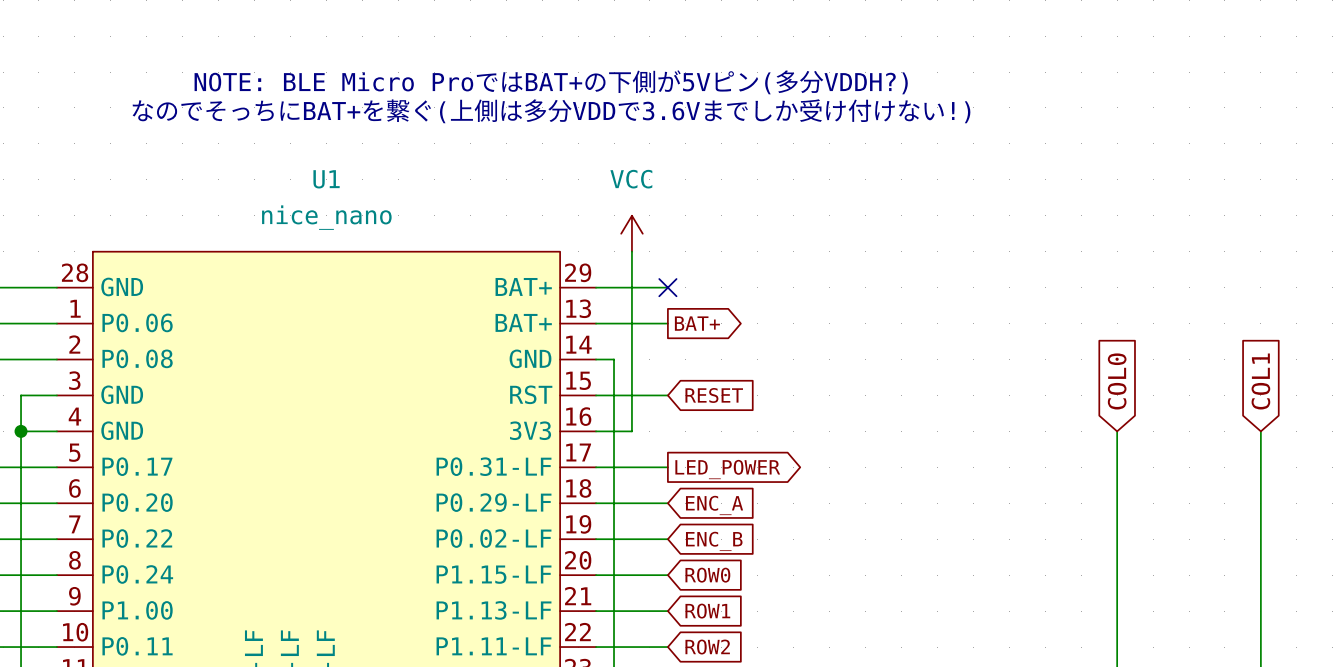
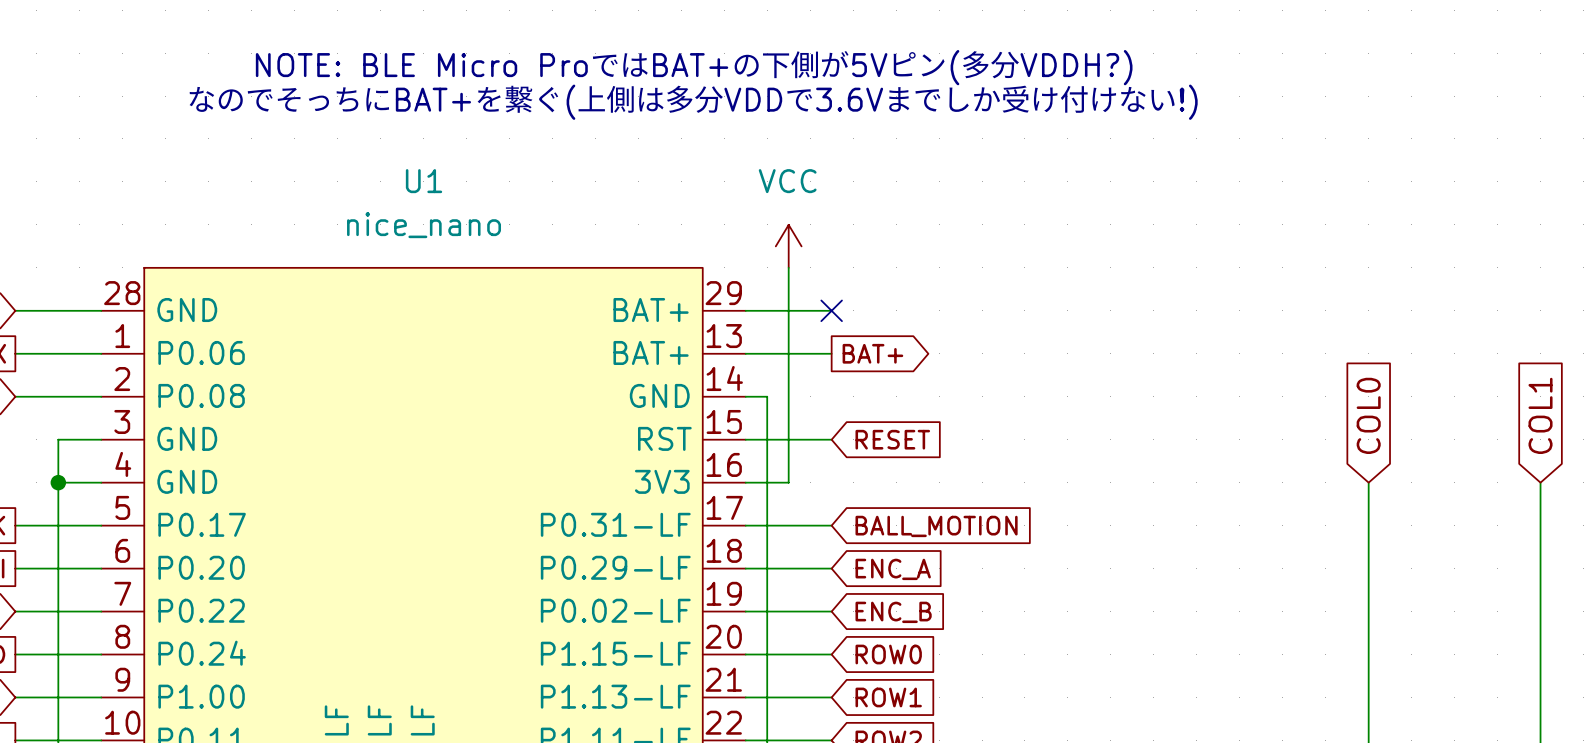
global label shape: output (727, 469) -> input (936, 526)
global label: LED_POWER (727, 469) -> BALL_MOTION (936, 526)

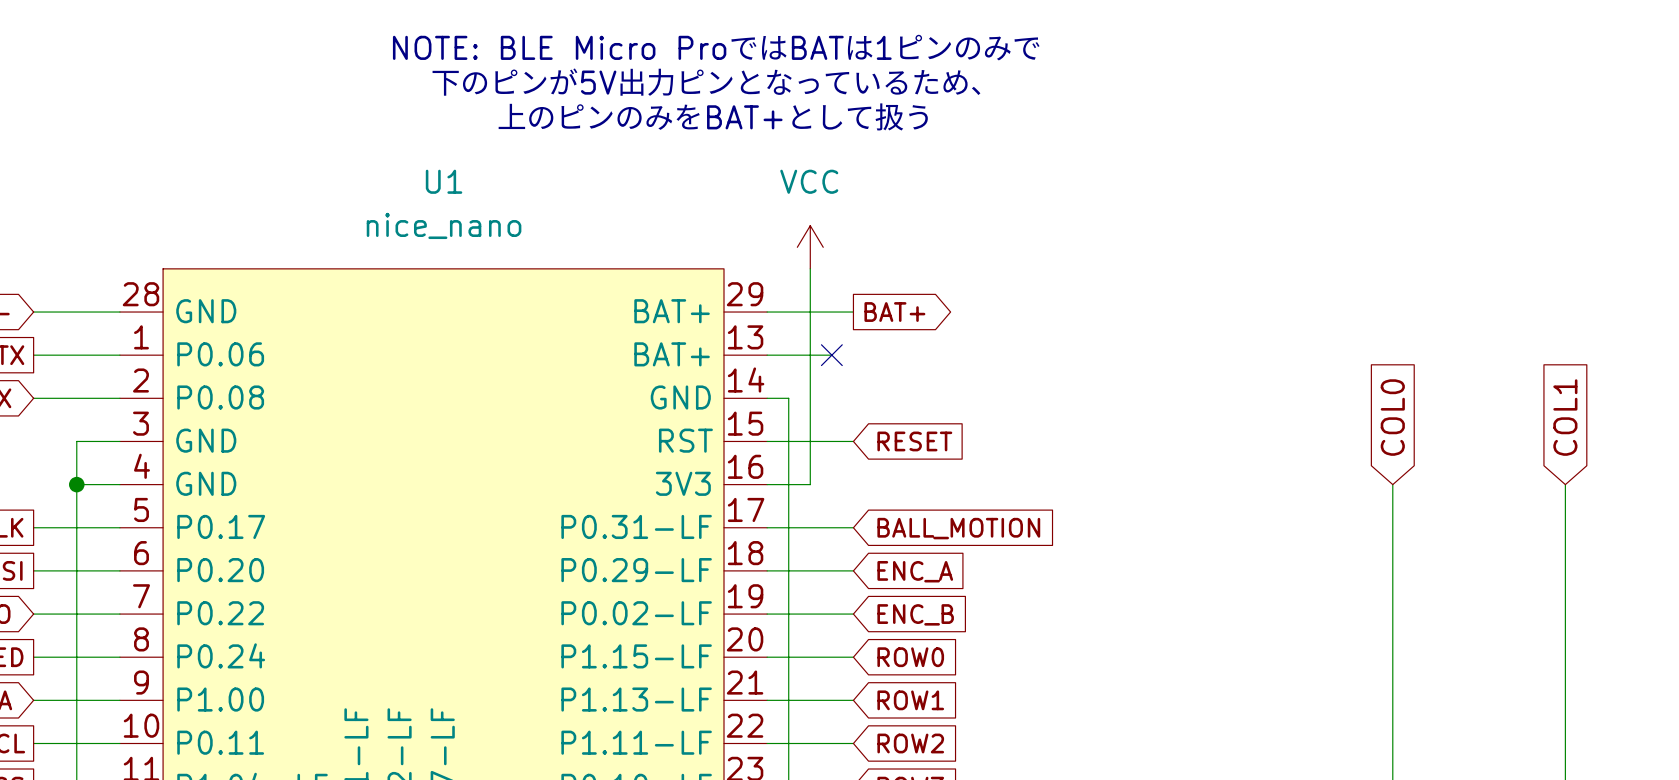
text: NOTE: BLE Micro ProではBAT+の下側が5Vピン(多分VDDH?) (694, 67) -> NOTE: BLE Micro ProではBATは1ピンのみで (716, 47)
text: none -> 下のピンが5V出力ピンとなっているため、 (706, 82)
text: なのでそっちにBAT+を繋ぐ(上側は多分VDDで3.6Vまでしか受け付けない!) (692, 102) -> none
text: none -> 上のピンのみをBAT+として扱う (713, 116)
no-connect mark position: (831, 310) -> (831, 355)
wire: (810, 353) (831, 353) -> none
global label position: BAT+ (872, 353) -> BAT+ (894, 312)

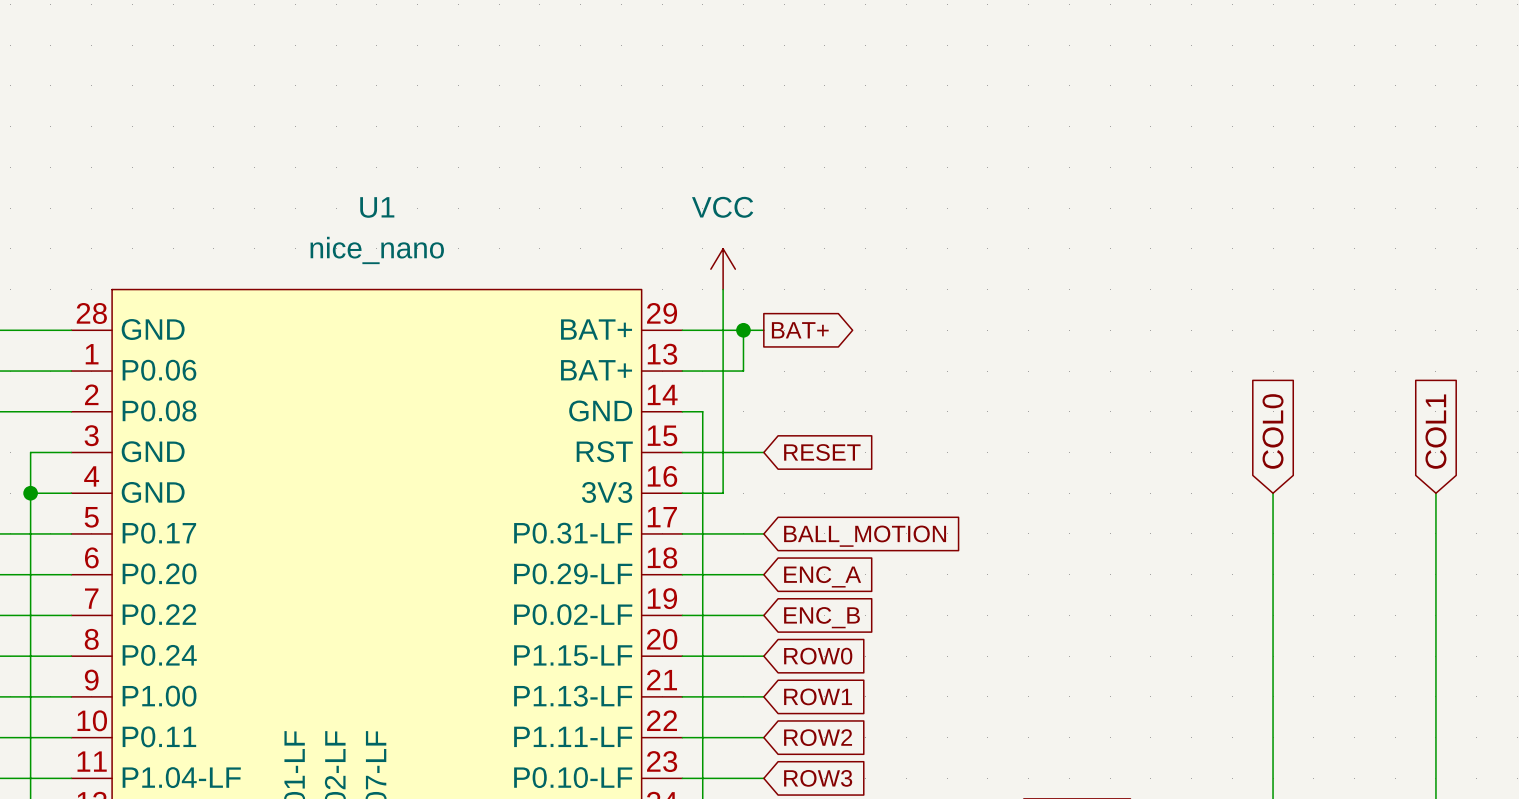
text: NOTE: BLE Micro ProではBATは1ピンのみで (716, 47) -> none
text: 下のピンが5V出力ピンとなっているため、 (706, 82) -> none
text: 上のピンのみをBAT+として扱う (713, 116) -> none
wire: none -> (743, 330) (743, 371)
junction: none -> (743, 330)
no-connect mark: (831, 355) -> none

